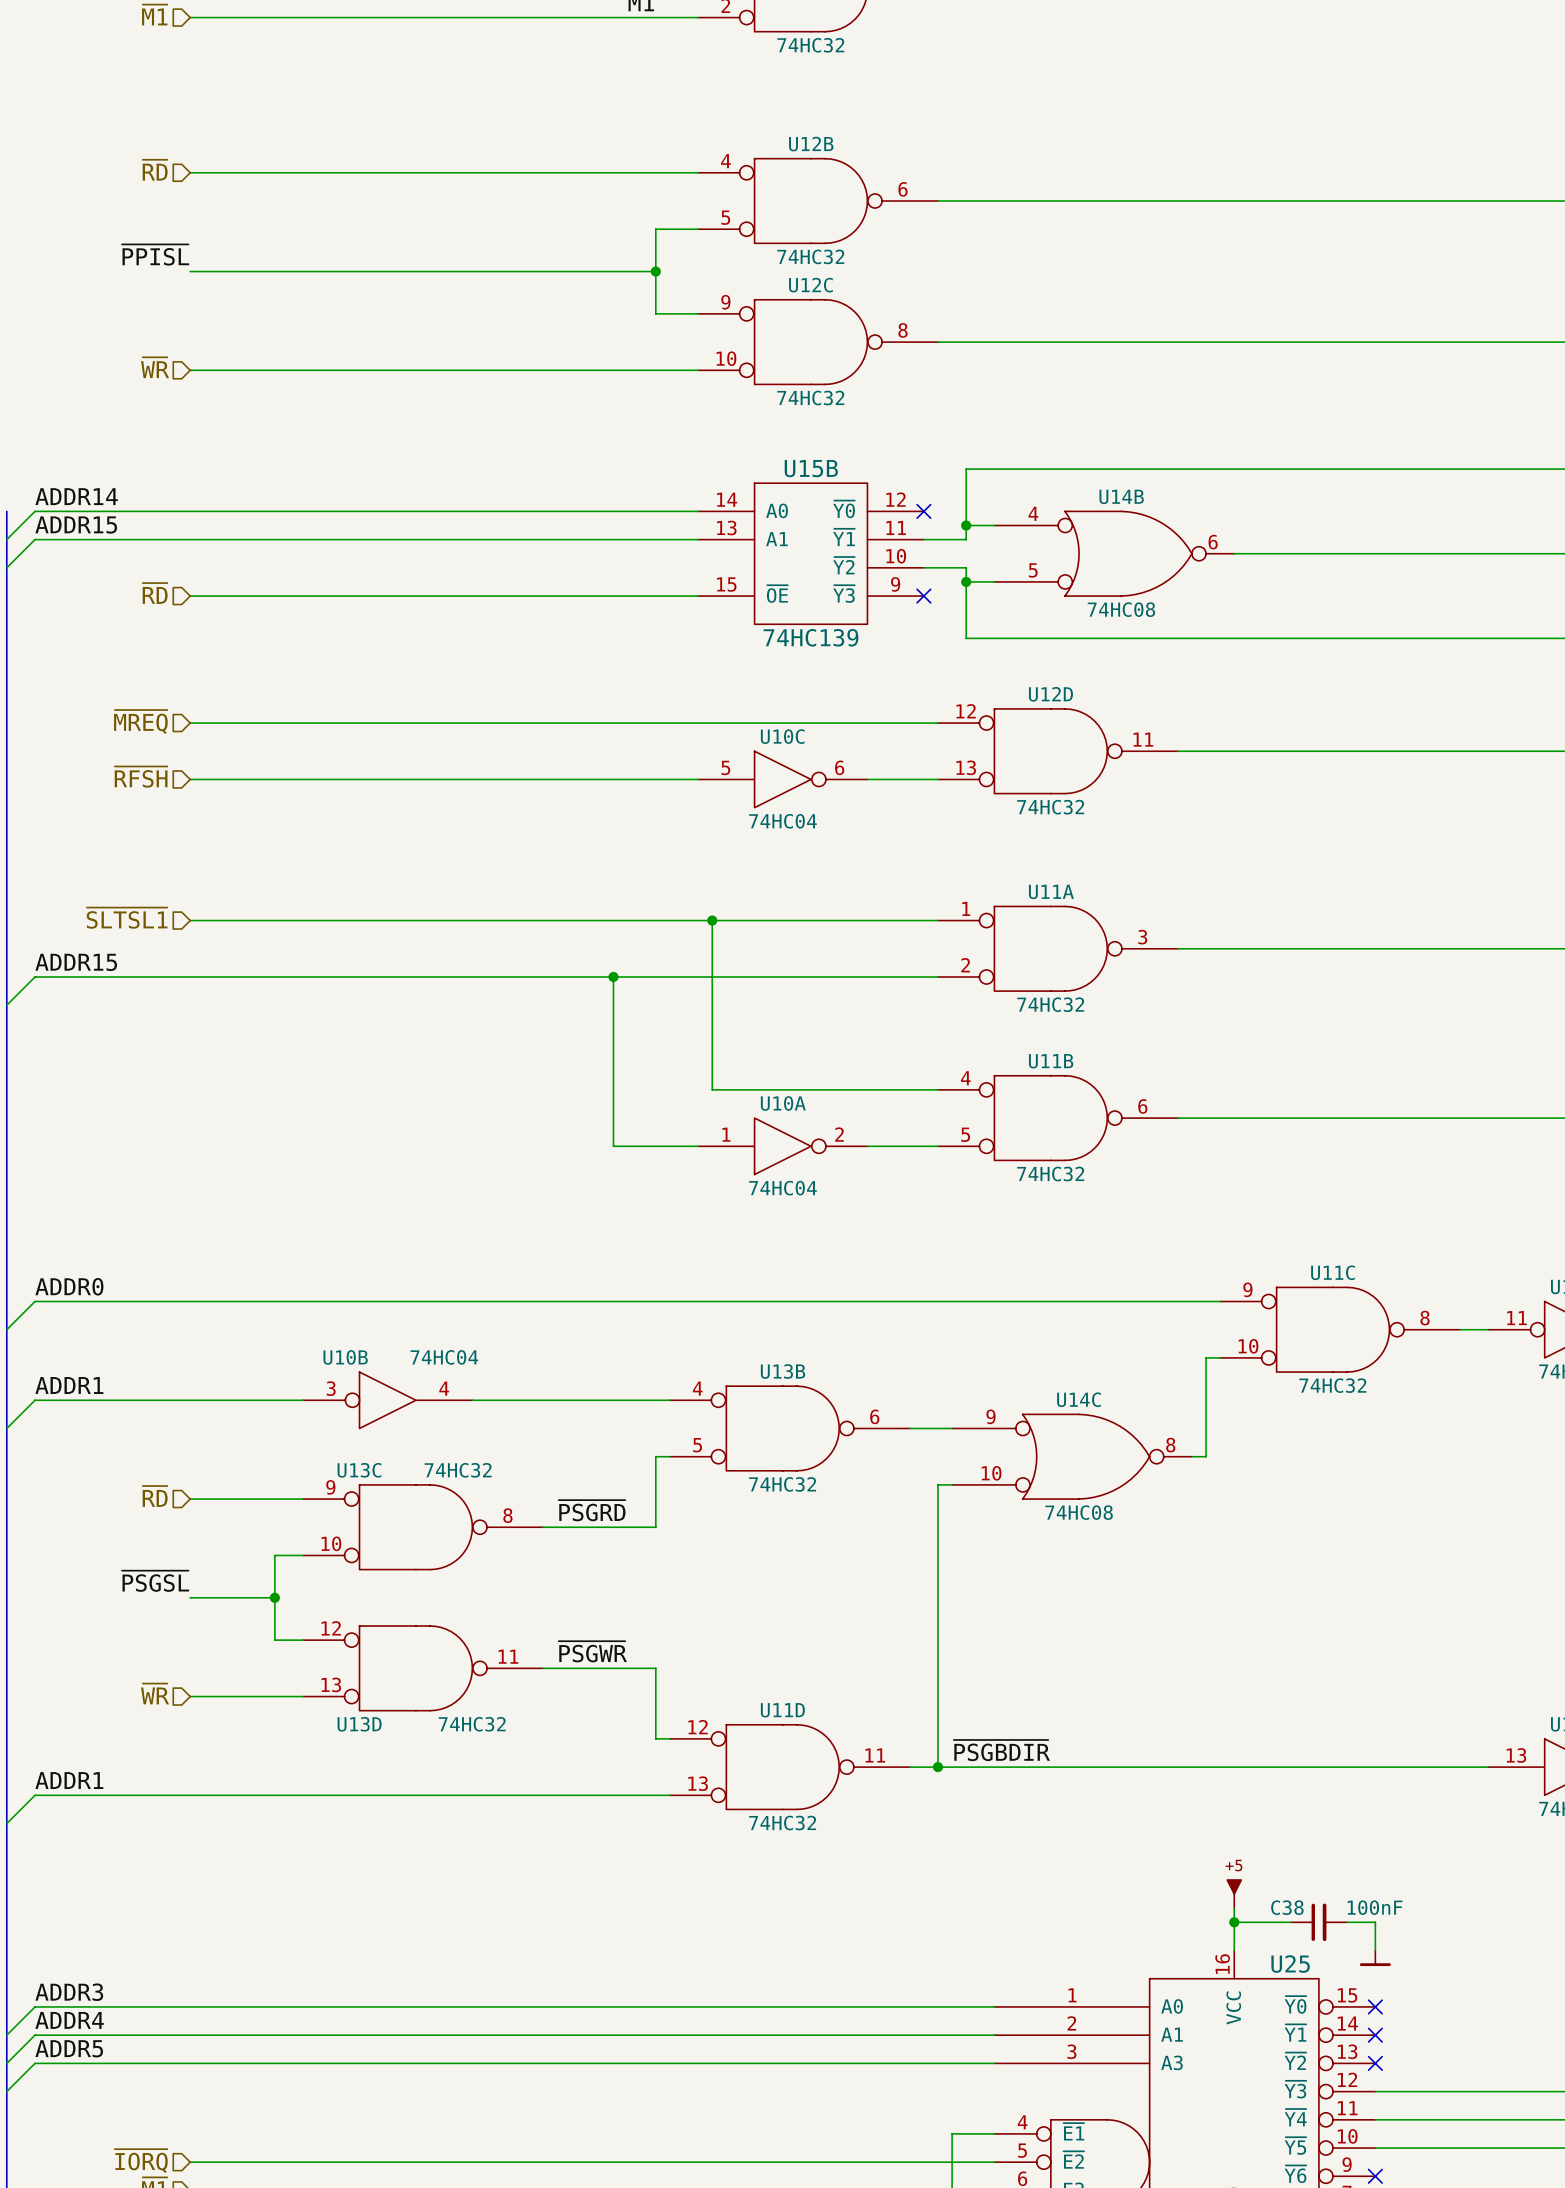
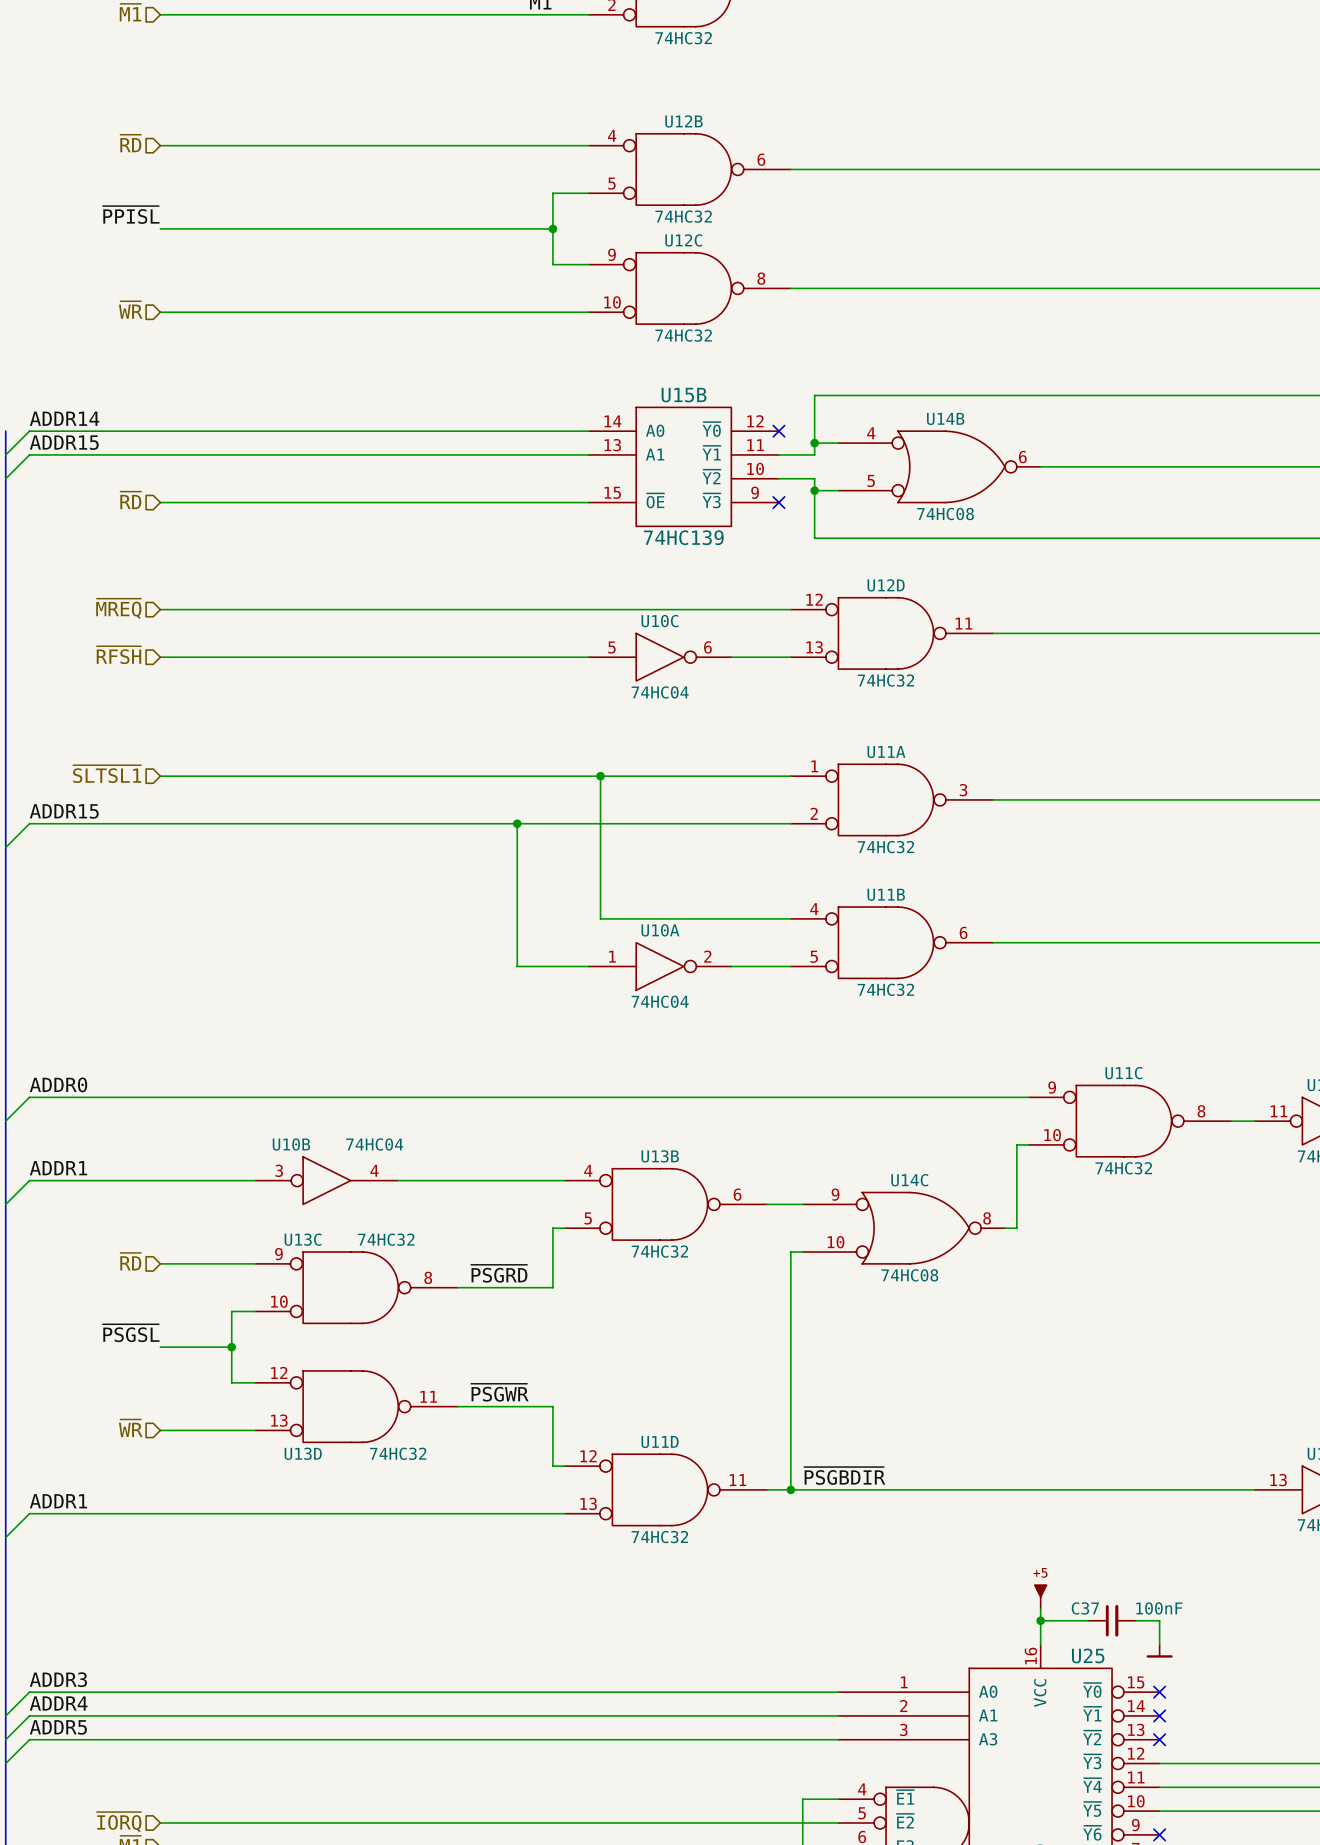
C38 name: C38 (1287, 1907) -> C37 (1085, 1608)

